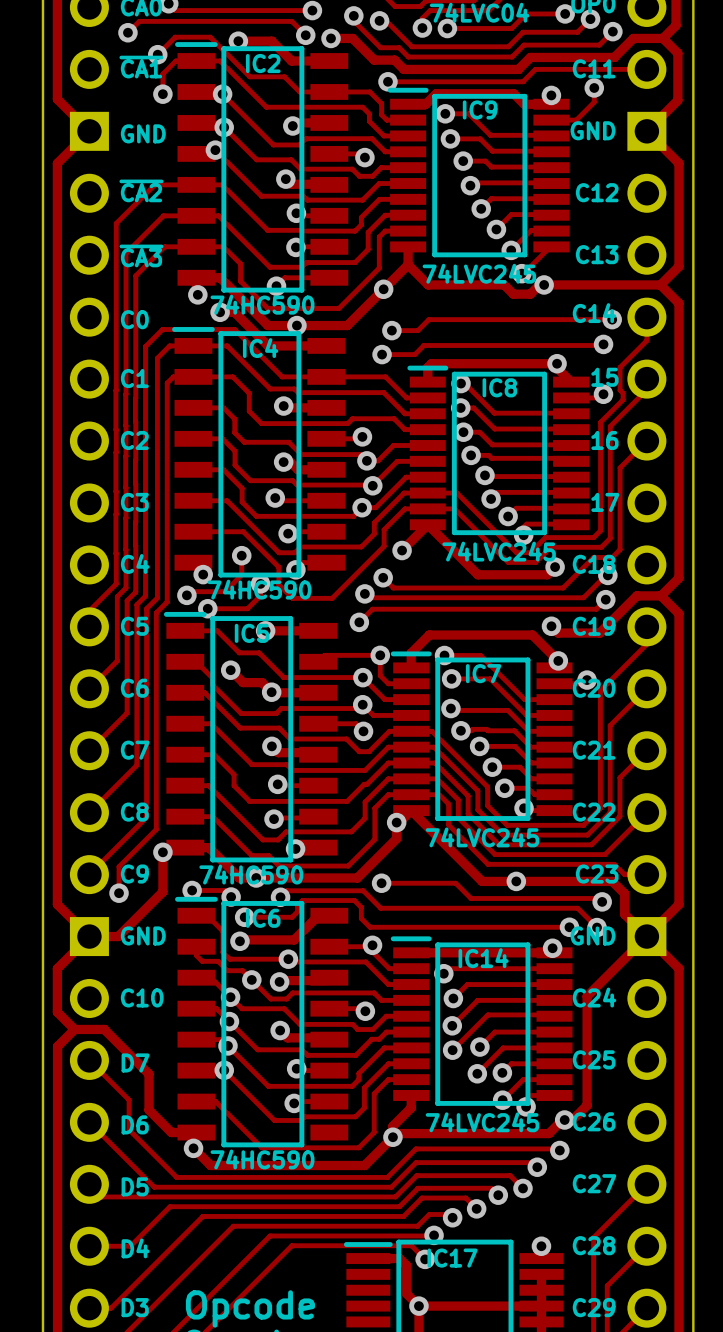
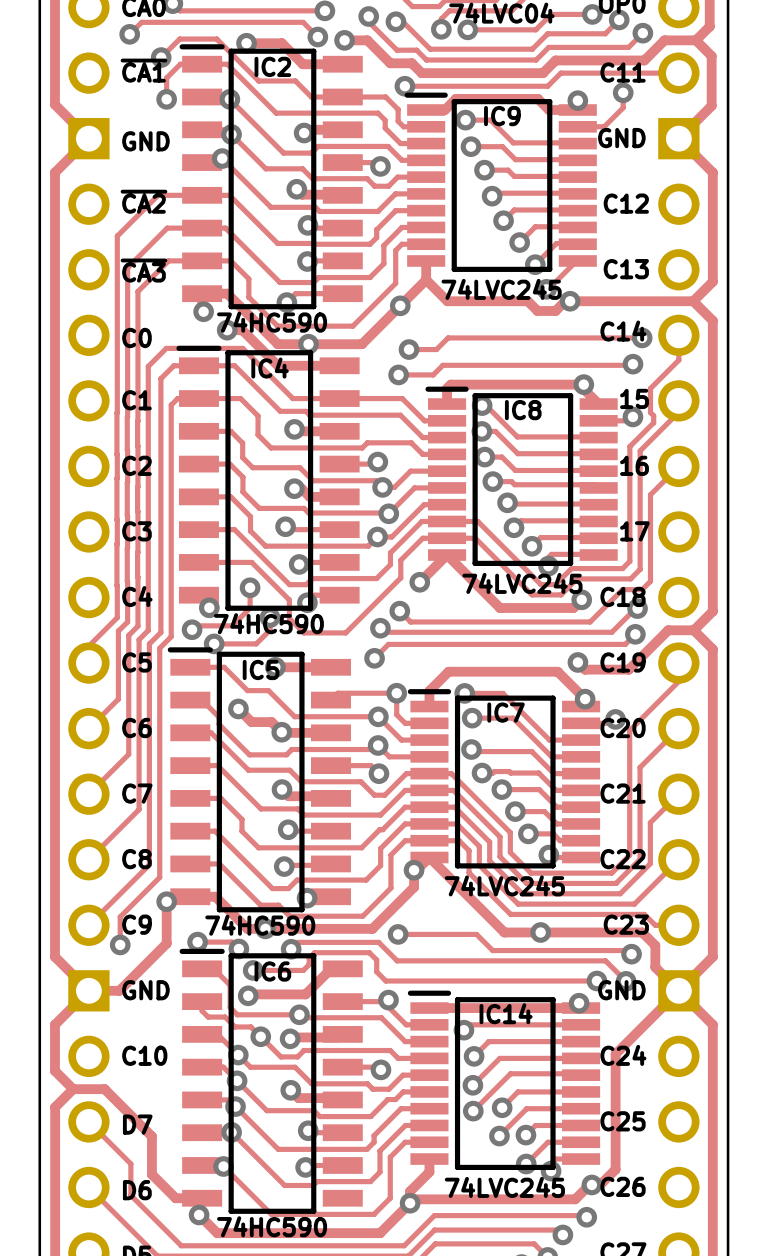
via: none -> (223, 1166)

